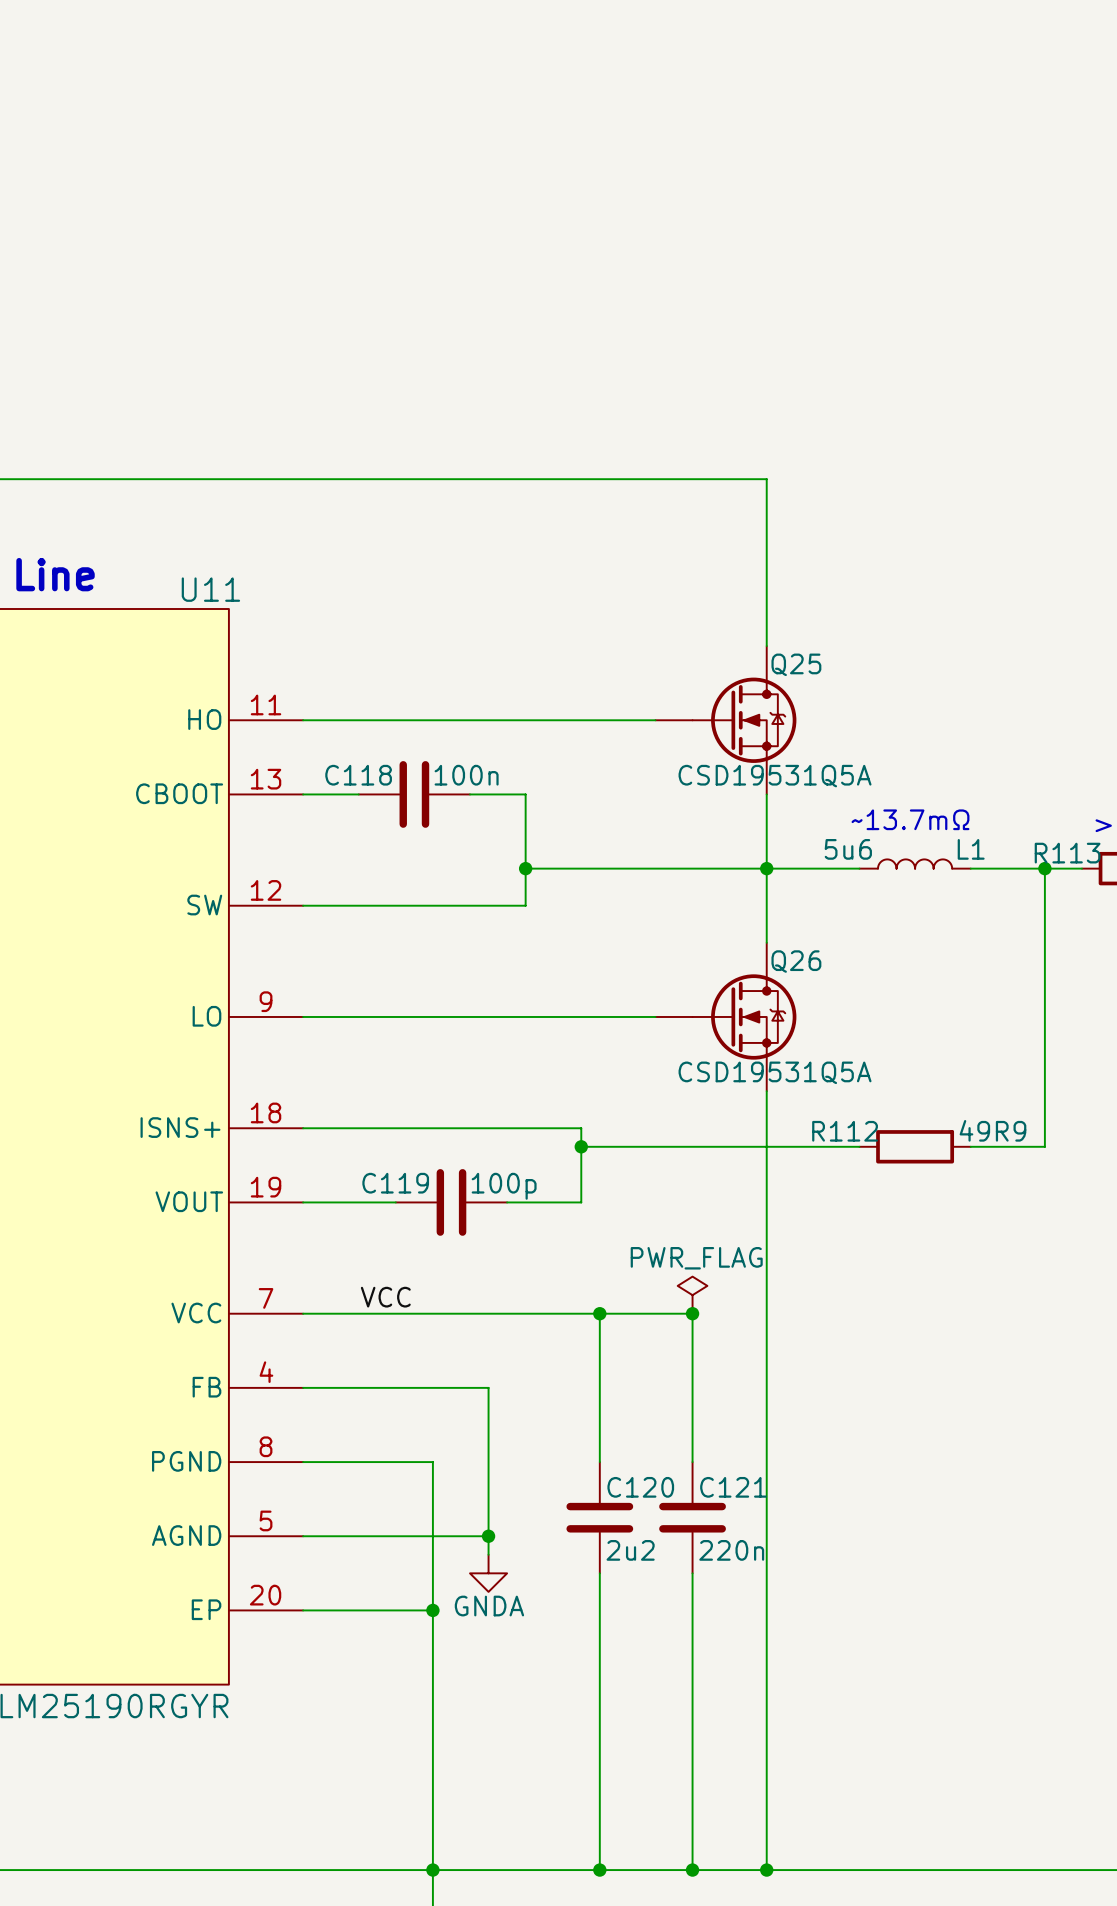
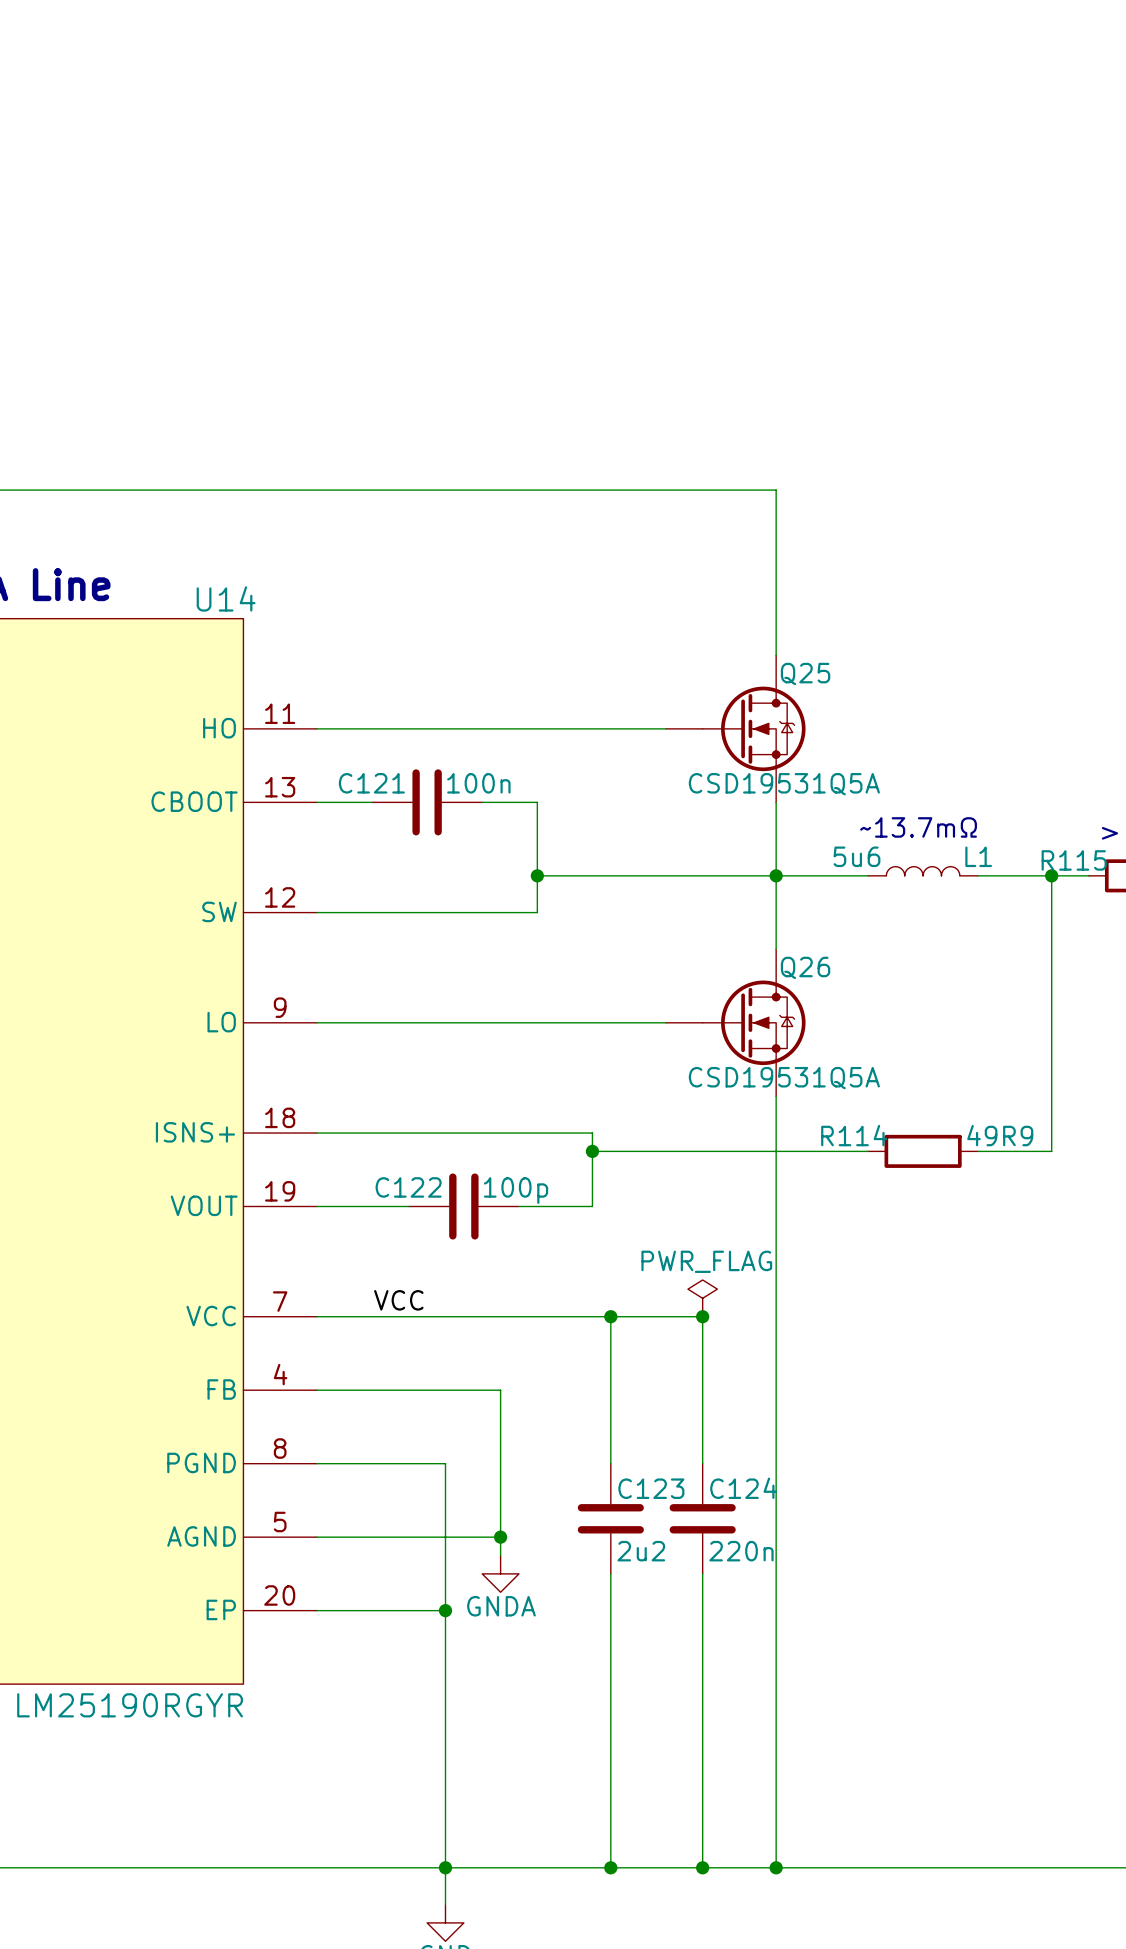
U11 name: U11 (210, 589) -> U14 (226, 598)
C118 name: C118 (358, 775) -> C121 (371, 783)
R113 name: R113 (1067, 853) -> R115 (1074, 860)
R112 name: R112 (845, 1131) -> R114 (854, 1135)
C119 name: C119 (395, 1183) -> C122 (408, 1187)
C120 name: C120 (640, 1487) -> C123 (651, 1488)
C121 name: C121 (733, 1487) -> C124 (743, 1488)

